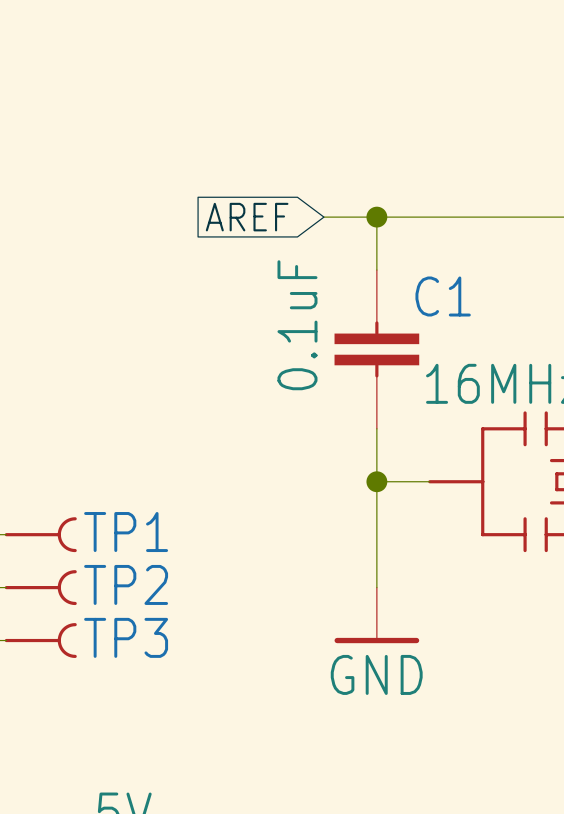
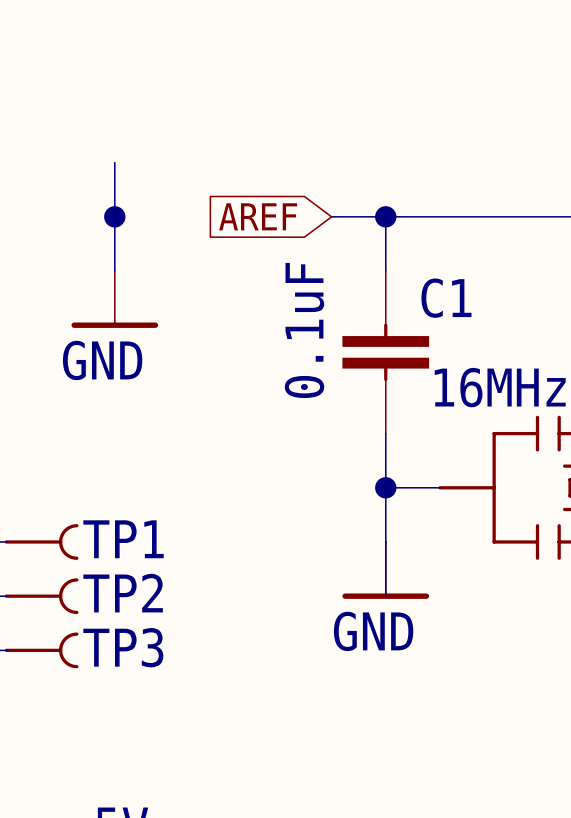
wire: none -> (114, 162) (114, 271)
junction: none -> (114, 216)
power symbol: none -> GND (114, 299)
power symbol position: GND (376, 615) -> GND (385, 570)

